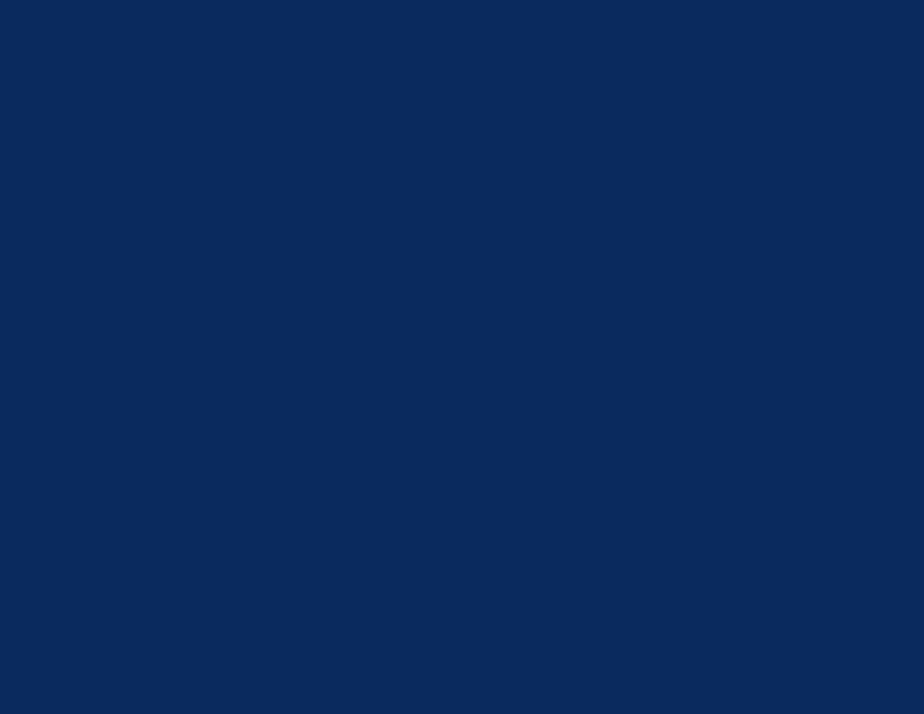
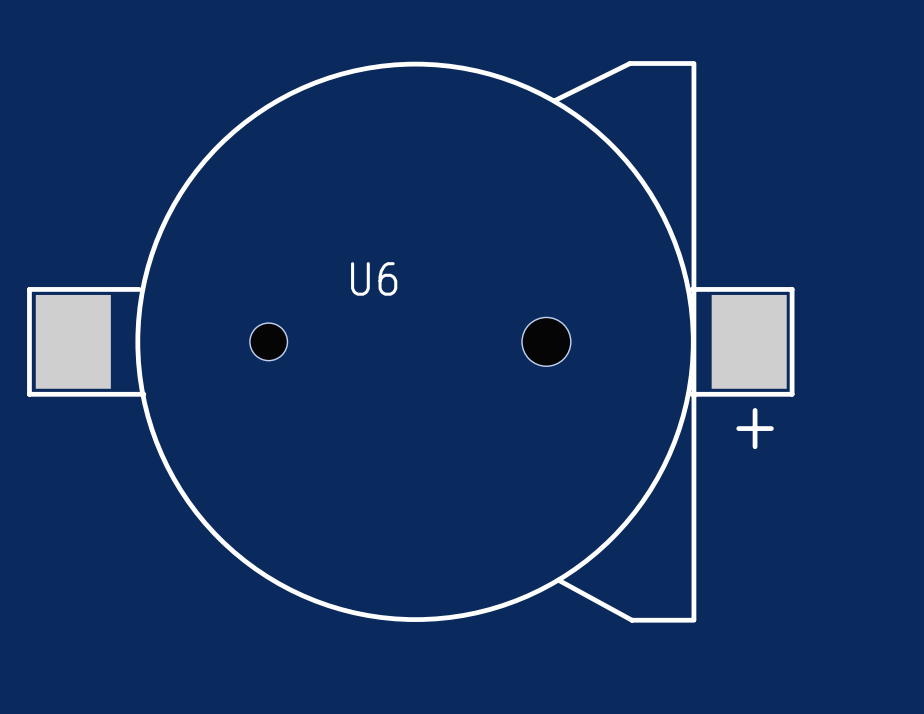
U6: none -> (410, 341)

